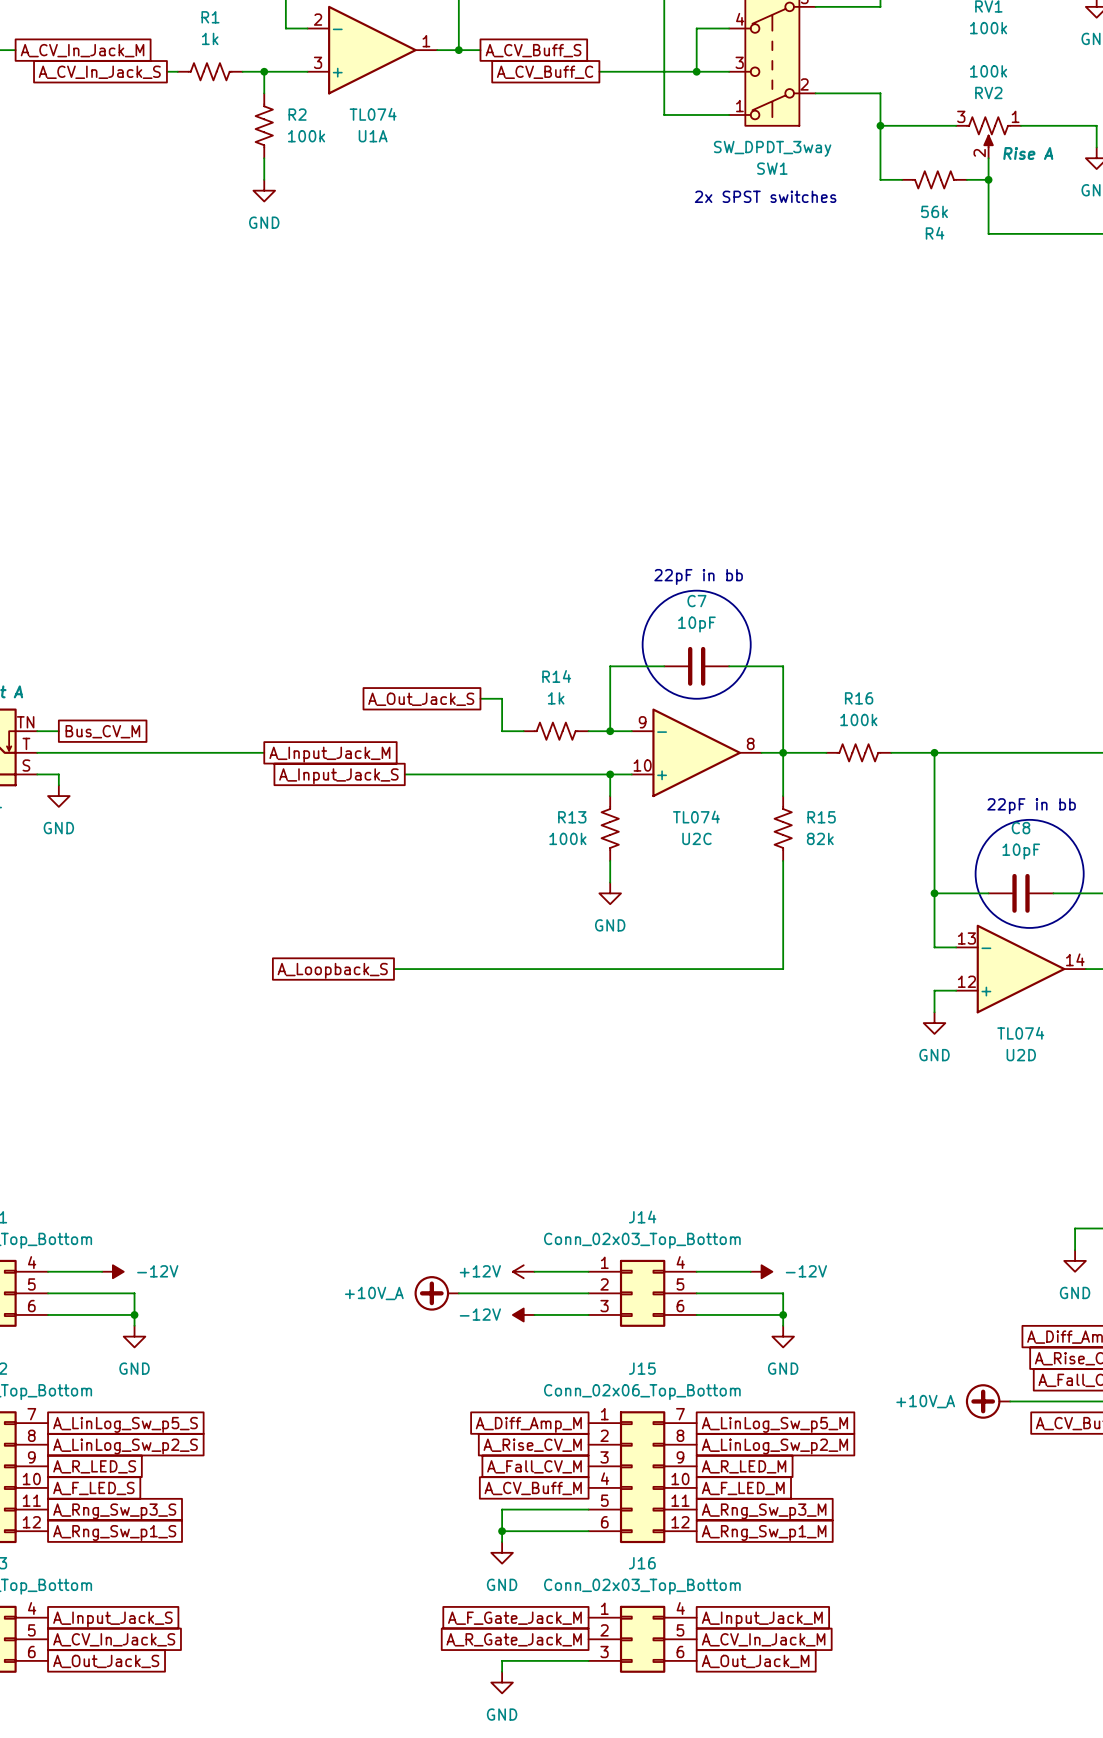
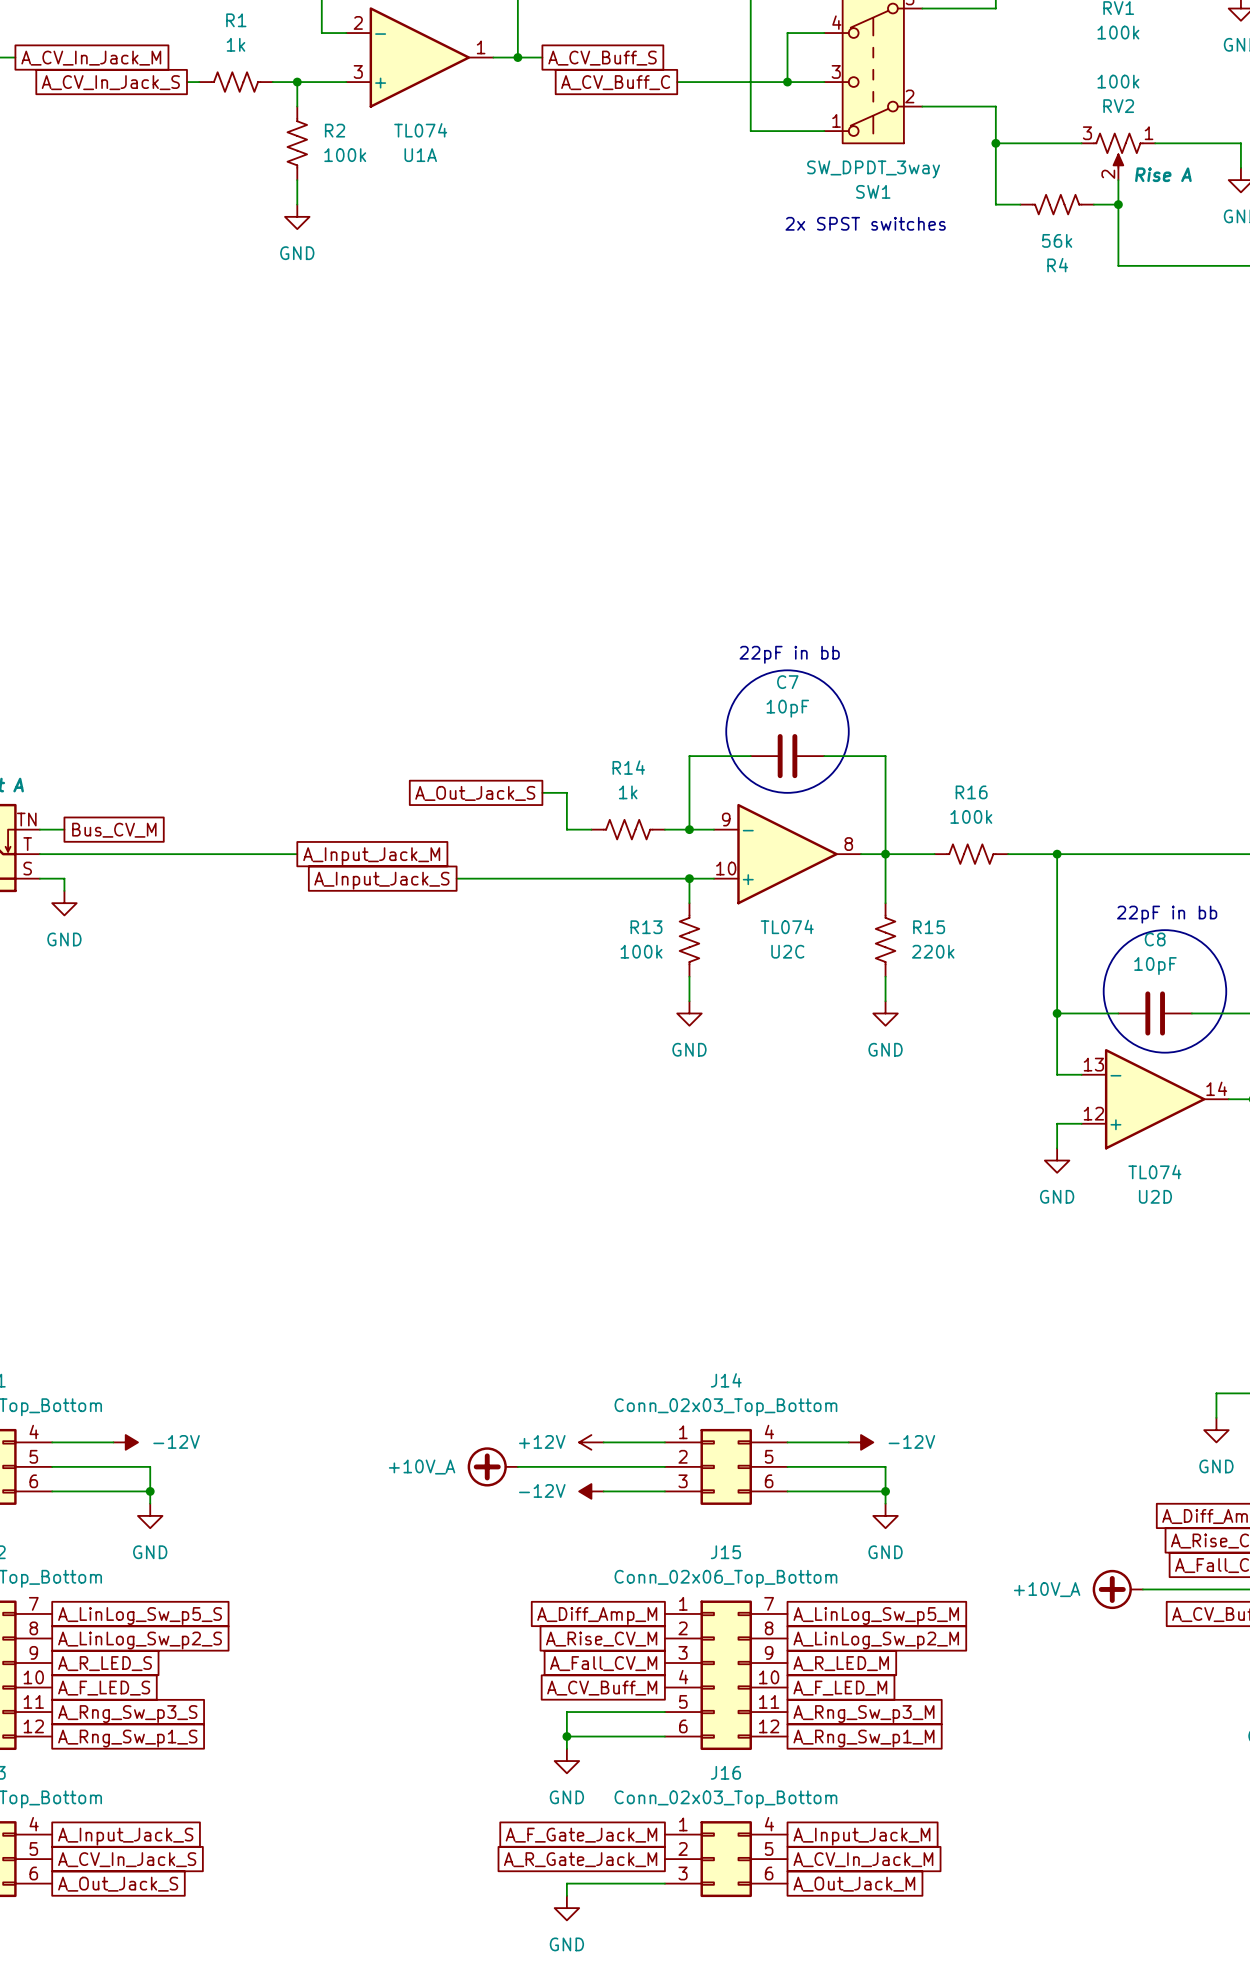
R15 value: 82k (820, 838) -> 220k (933, 951)
wire: (783, 882) (783, 969) (393, 969) -> none
power symbol: none -> GND (885, 1013)
global label: A_Loopback_S (332, 970) -> none

